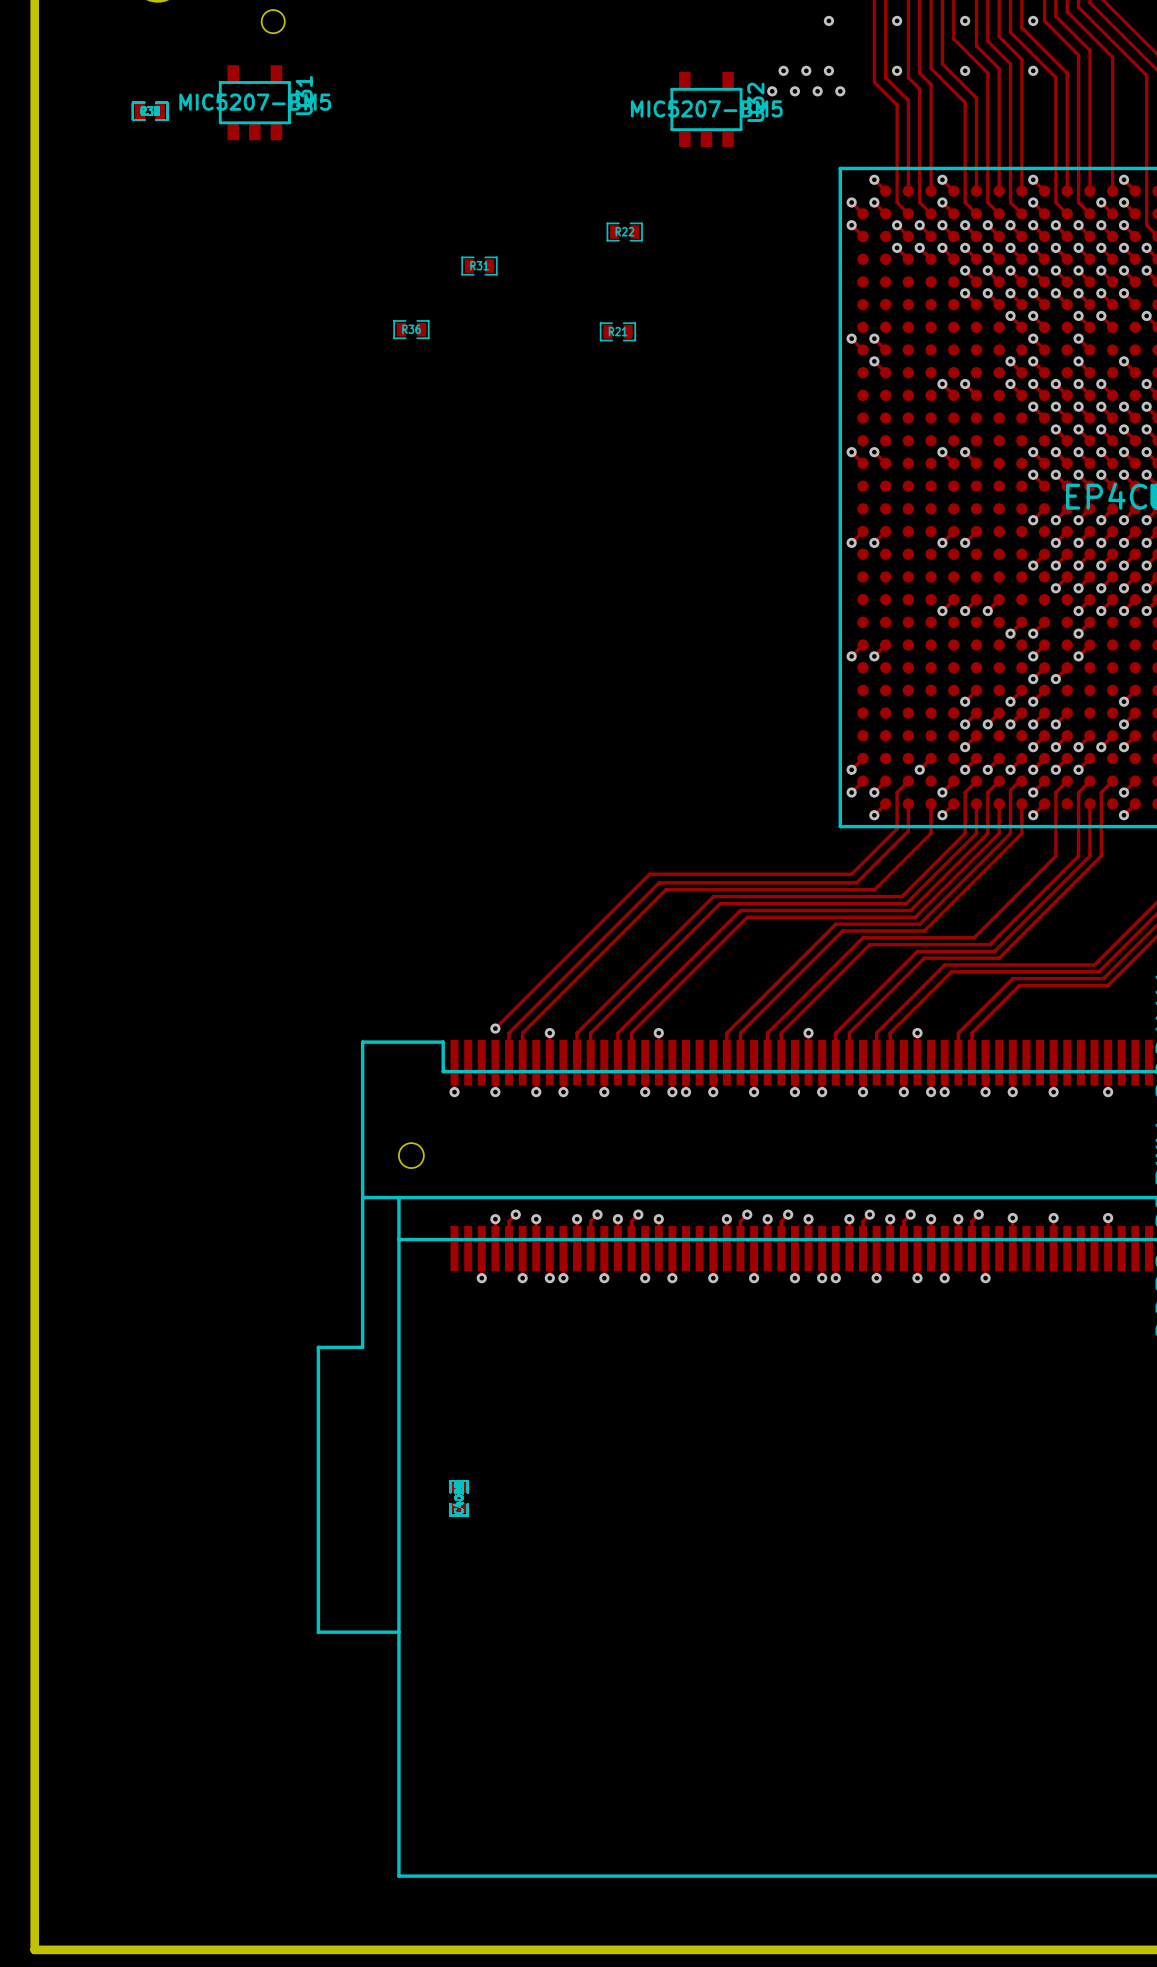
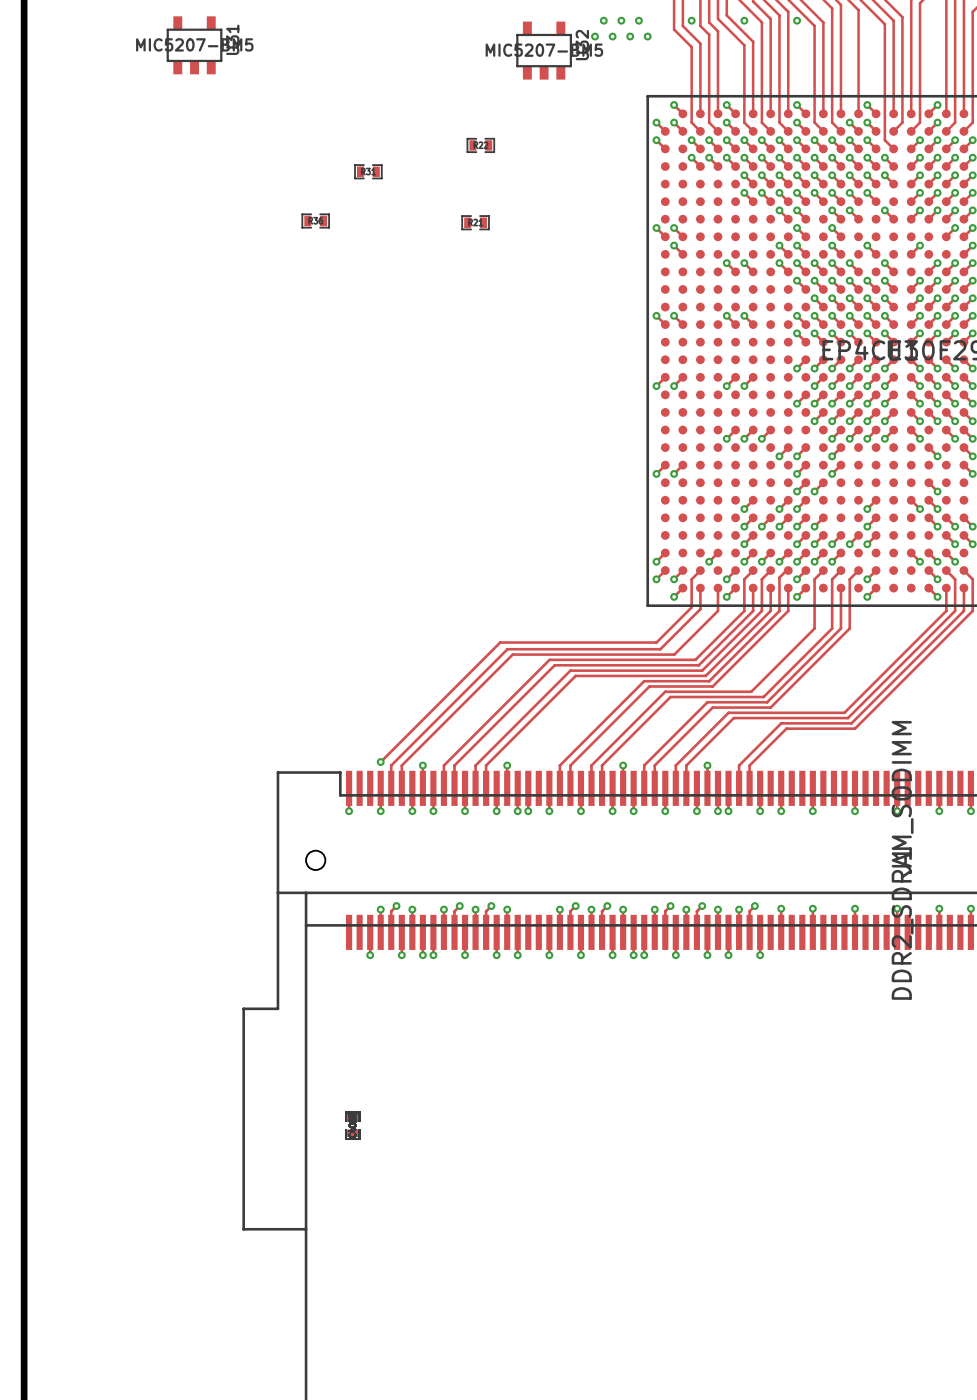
part: (150, 111) -> none
part: (150, 111) -> none
part: (150, 111) -> none
part: (150, 111) -> none
part: (150, 111) -> none
part: (150, 111) -> none
part: (150, 111) -> none
part: (150, 111) -> none
part: (150, 111) -> none
part: (150, 111) -> none
part: (150, 111) -> none
part: (150, 111) -> none
part: (150, 111) -> none

